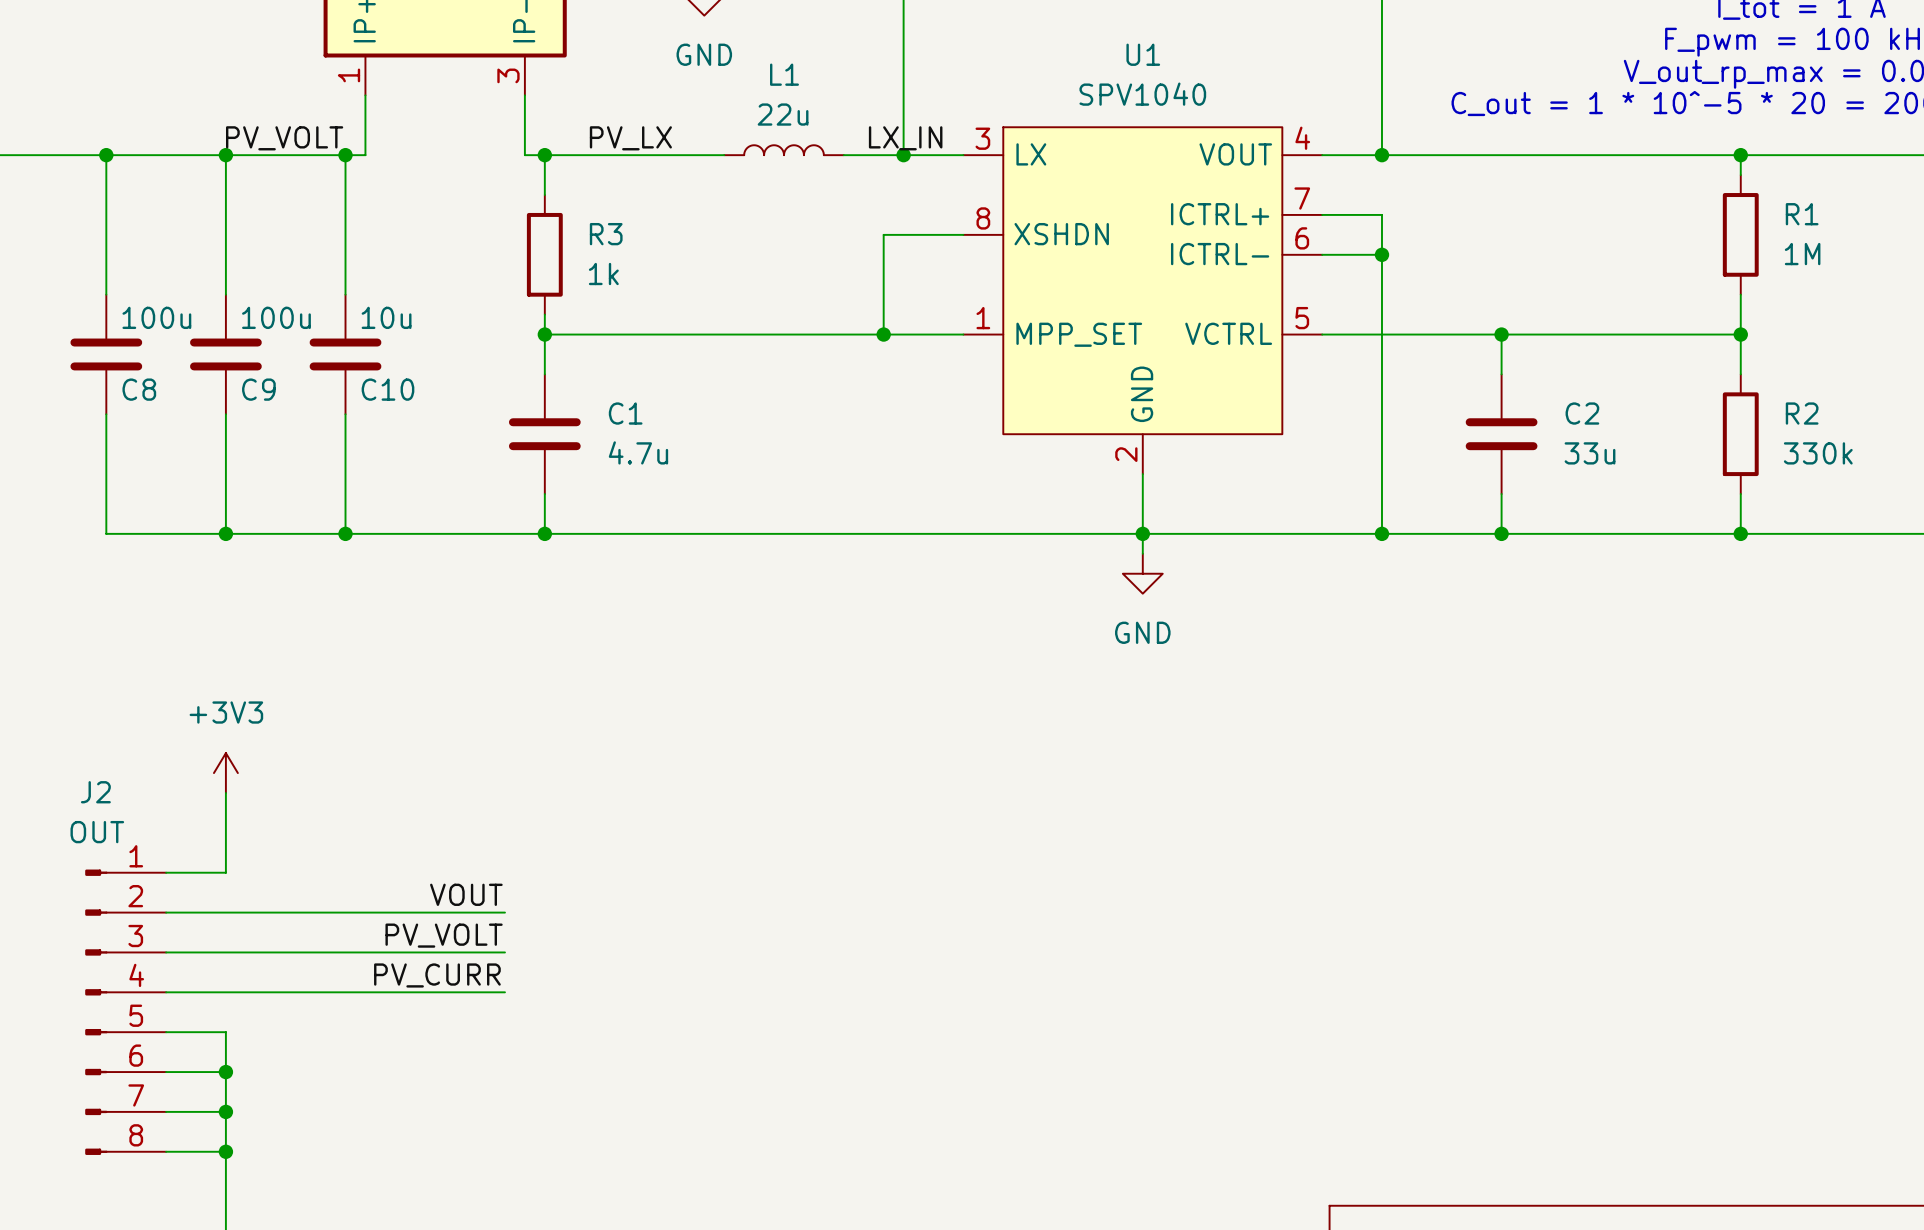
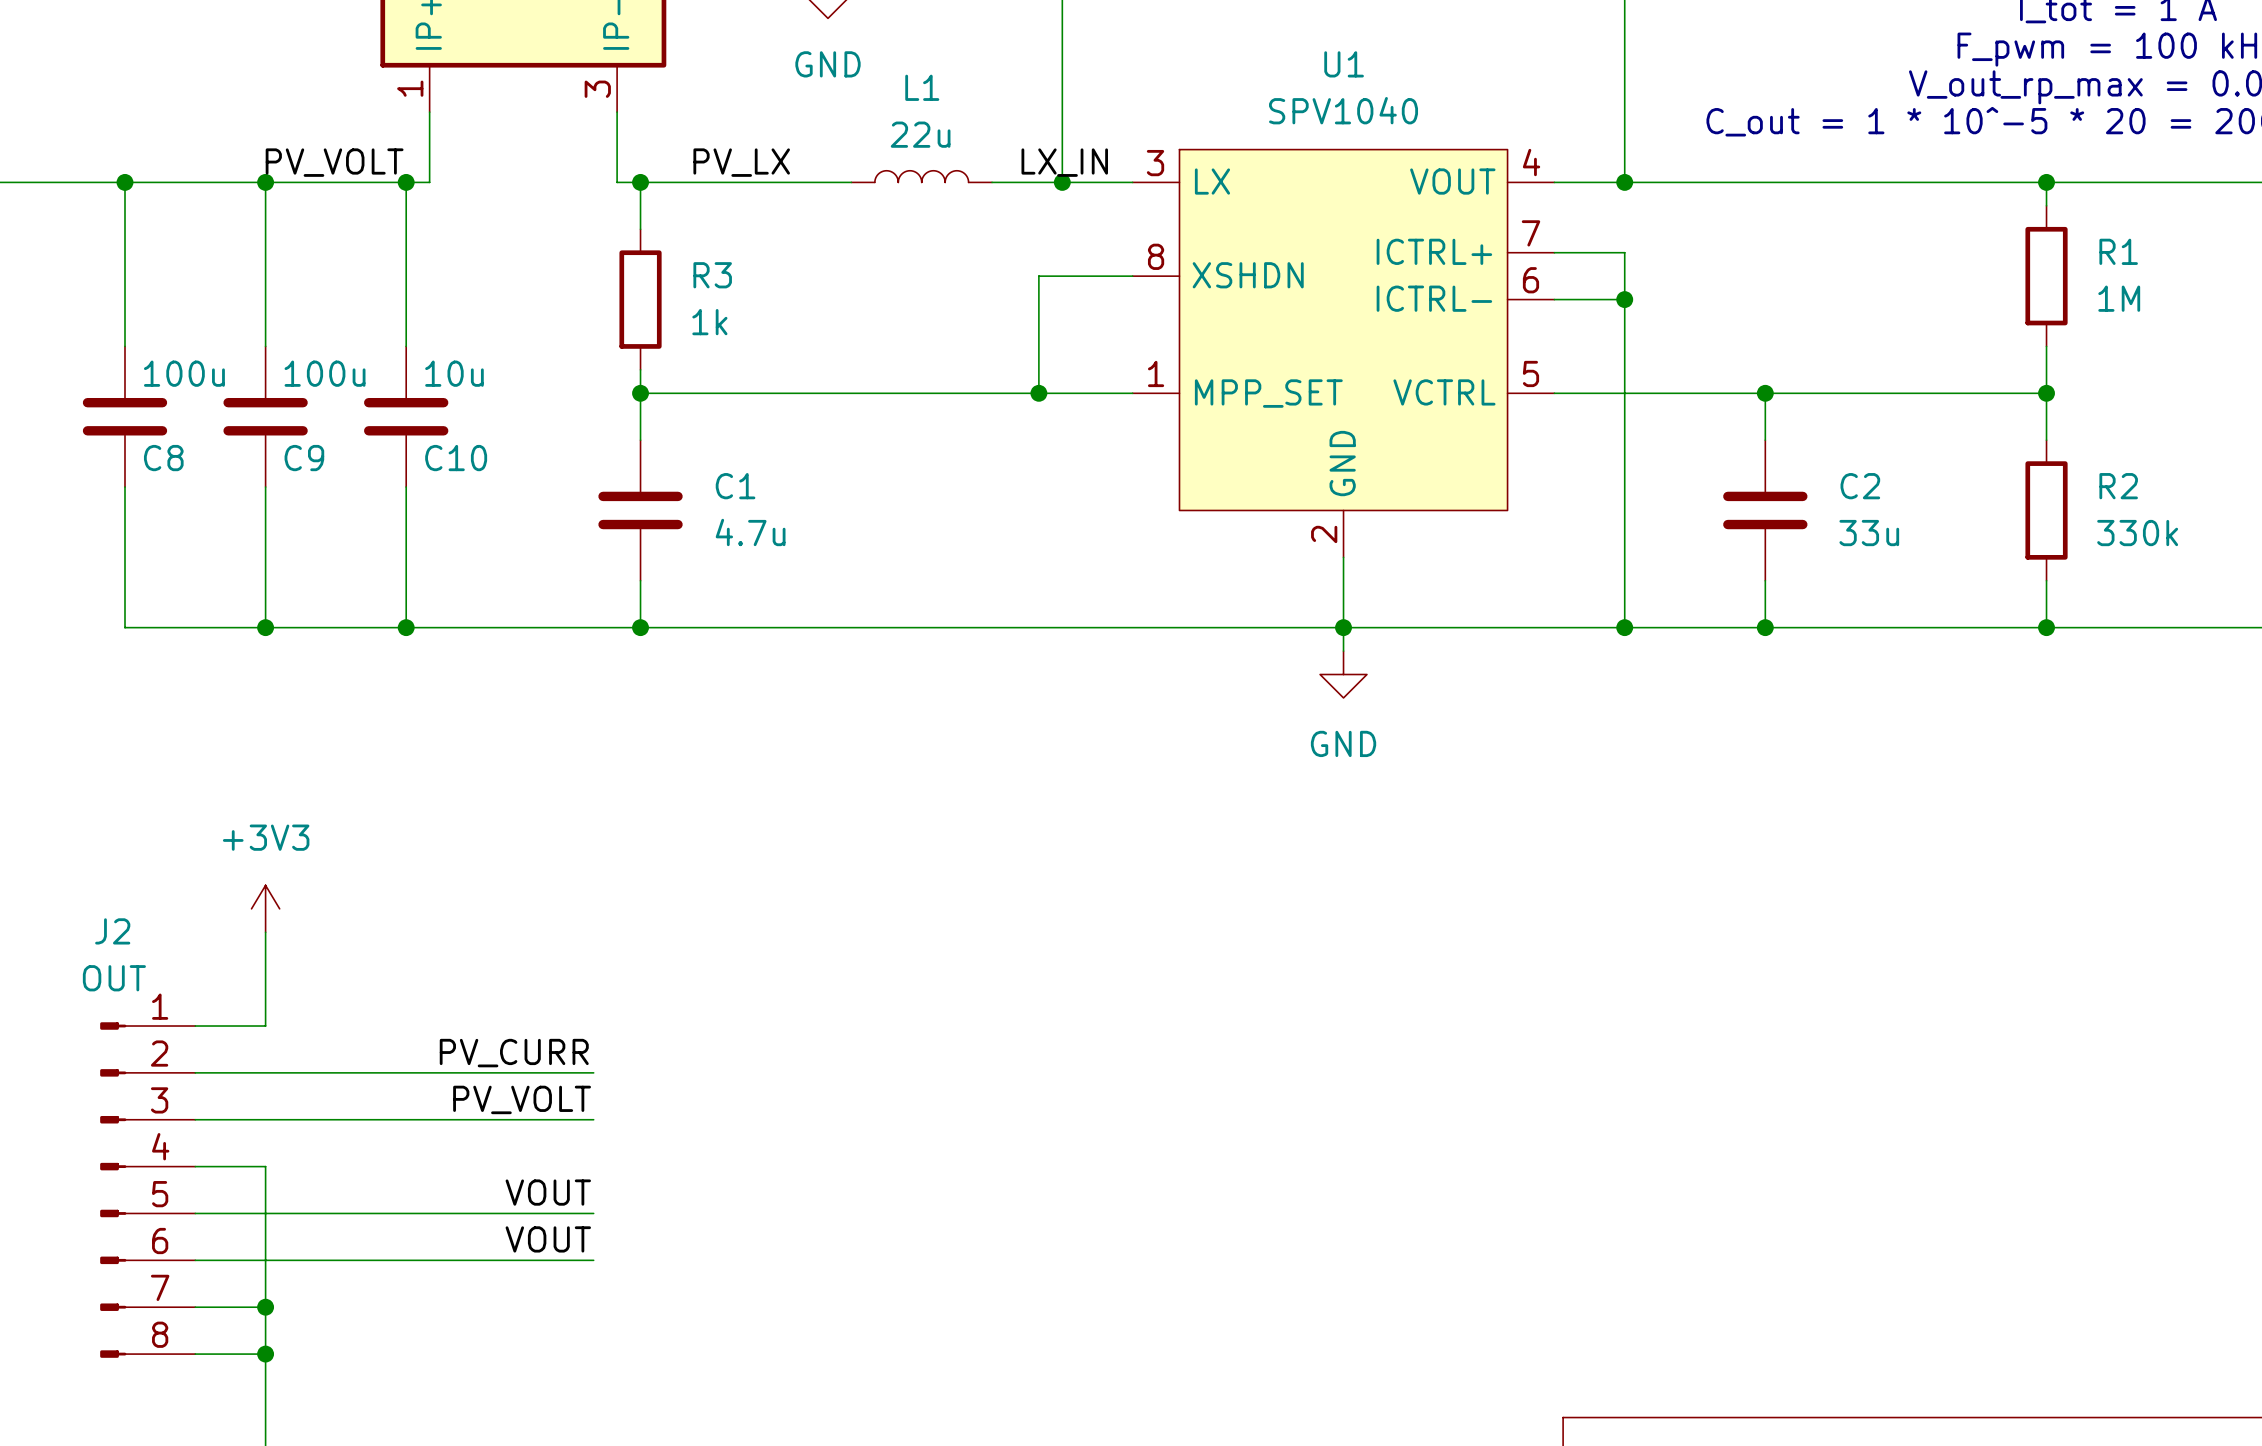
label: VOUT (466, 894) -> PV_CURR (514, 1053)
label: PV_CURR (437, 975) -> none
wire: (225, 992) (504, 992) -> (265, 1166) (265, 1213) (593, 1213)
label: none -> VOUT (548, 1192)
label: none -> VOUT (548, 1239)
wire: none -> (265, 1260) (593, 1260)
junction: (225, 1072) -> none

